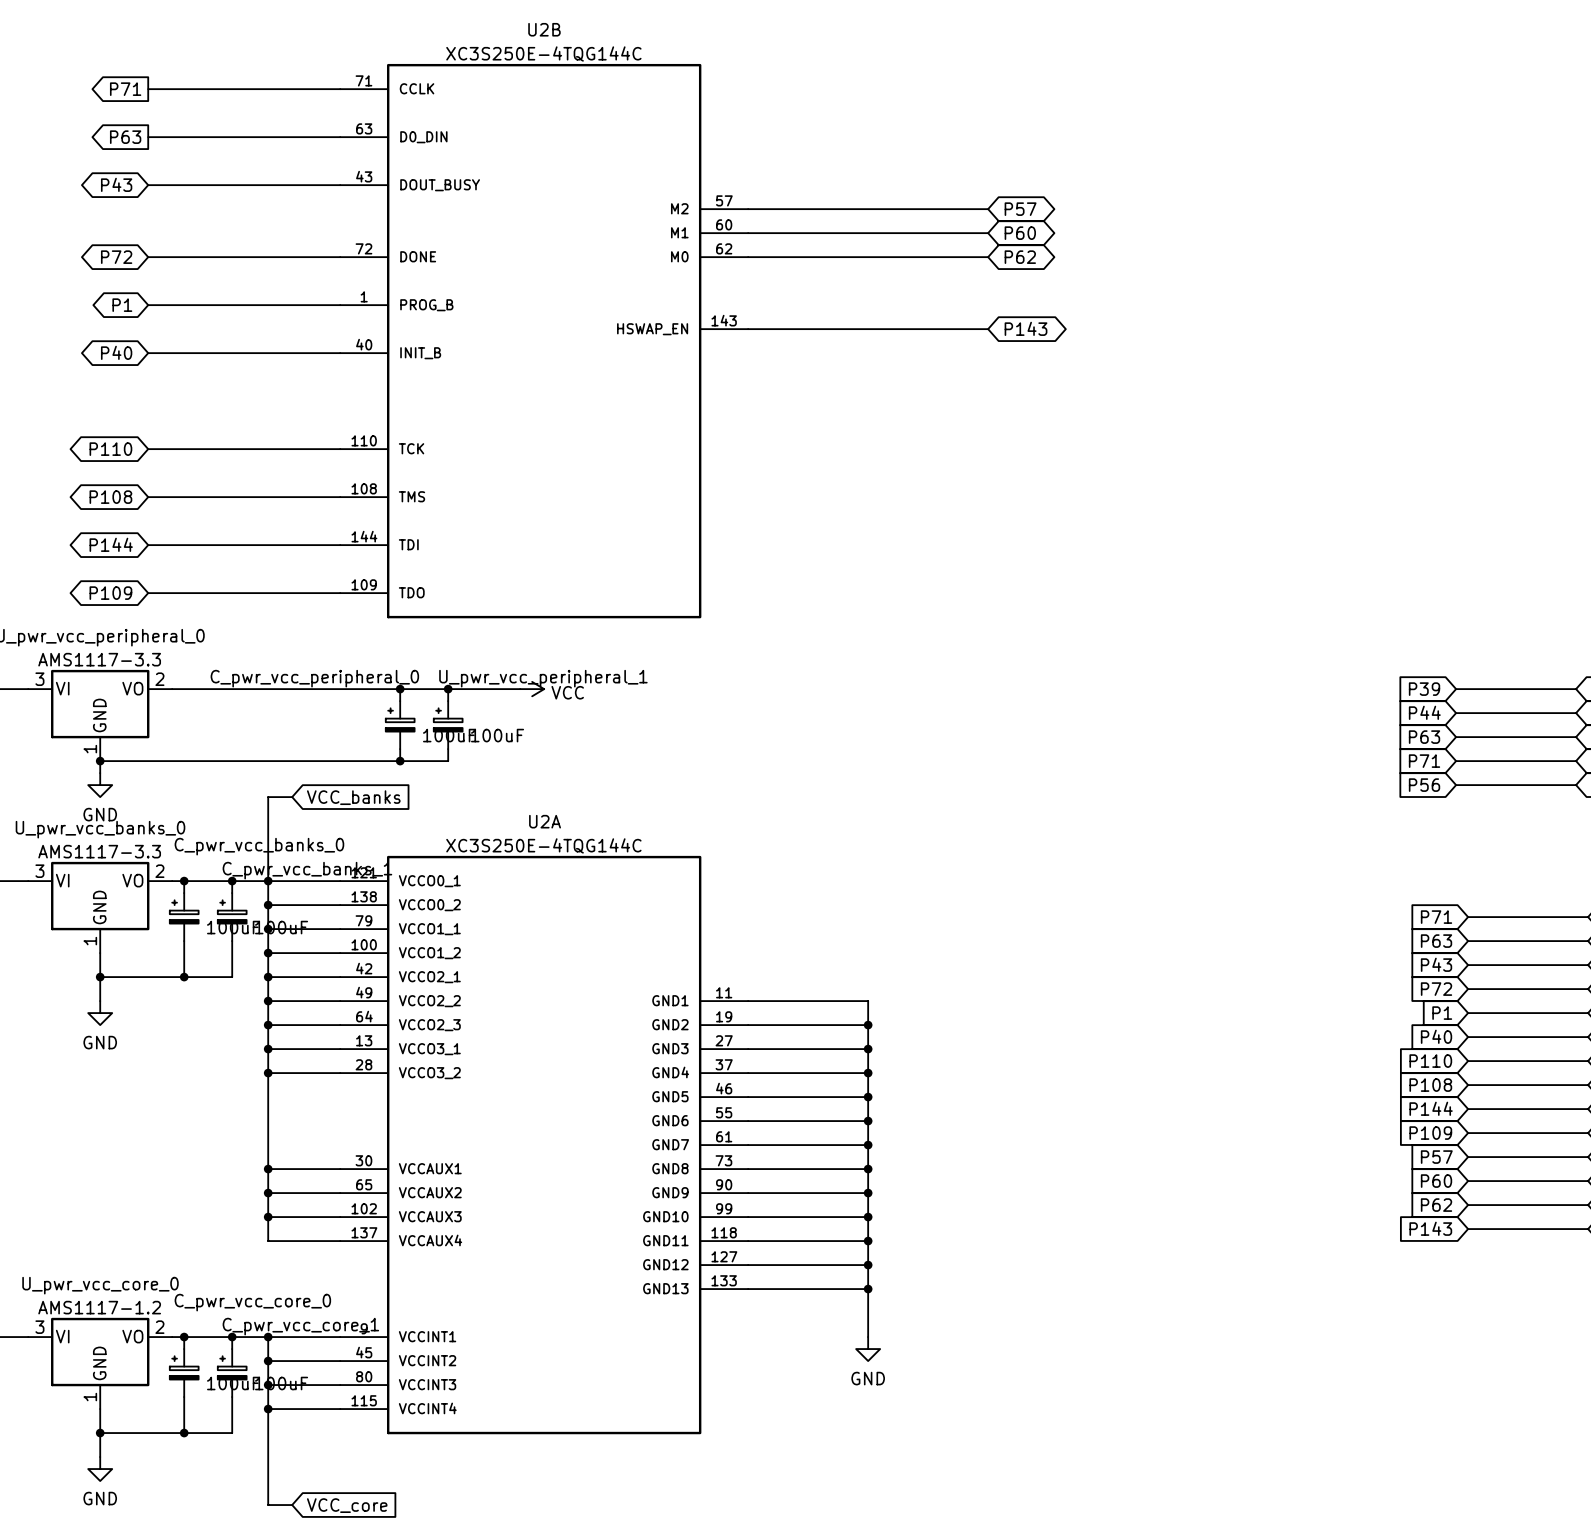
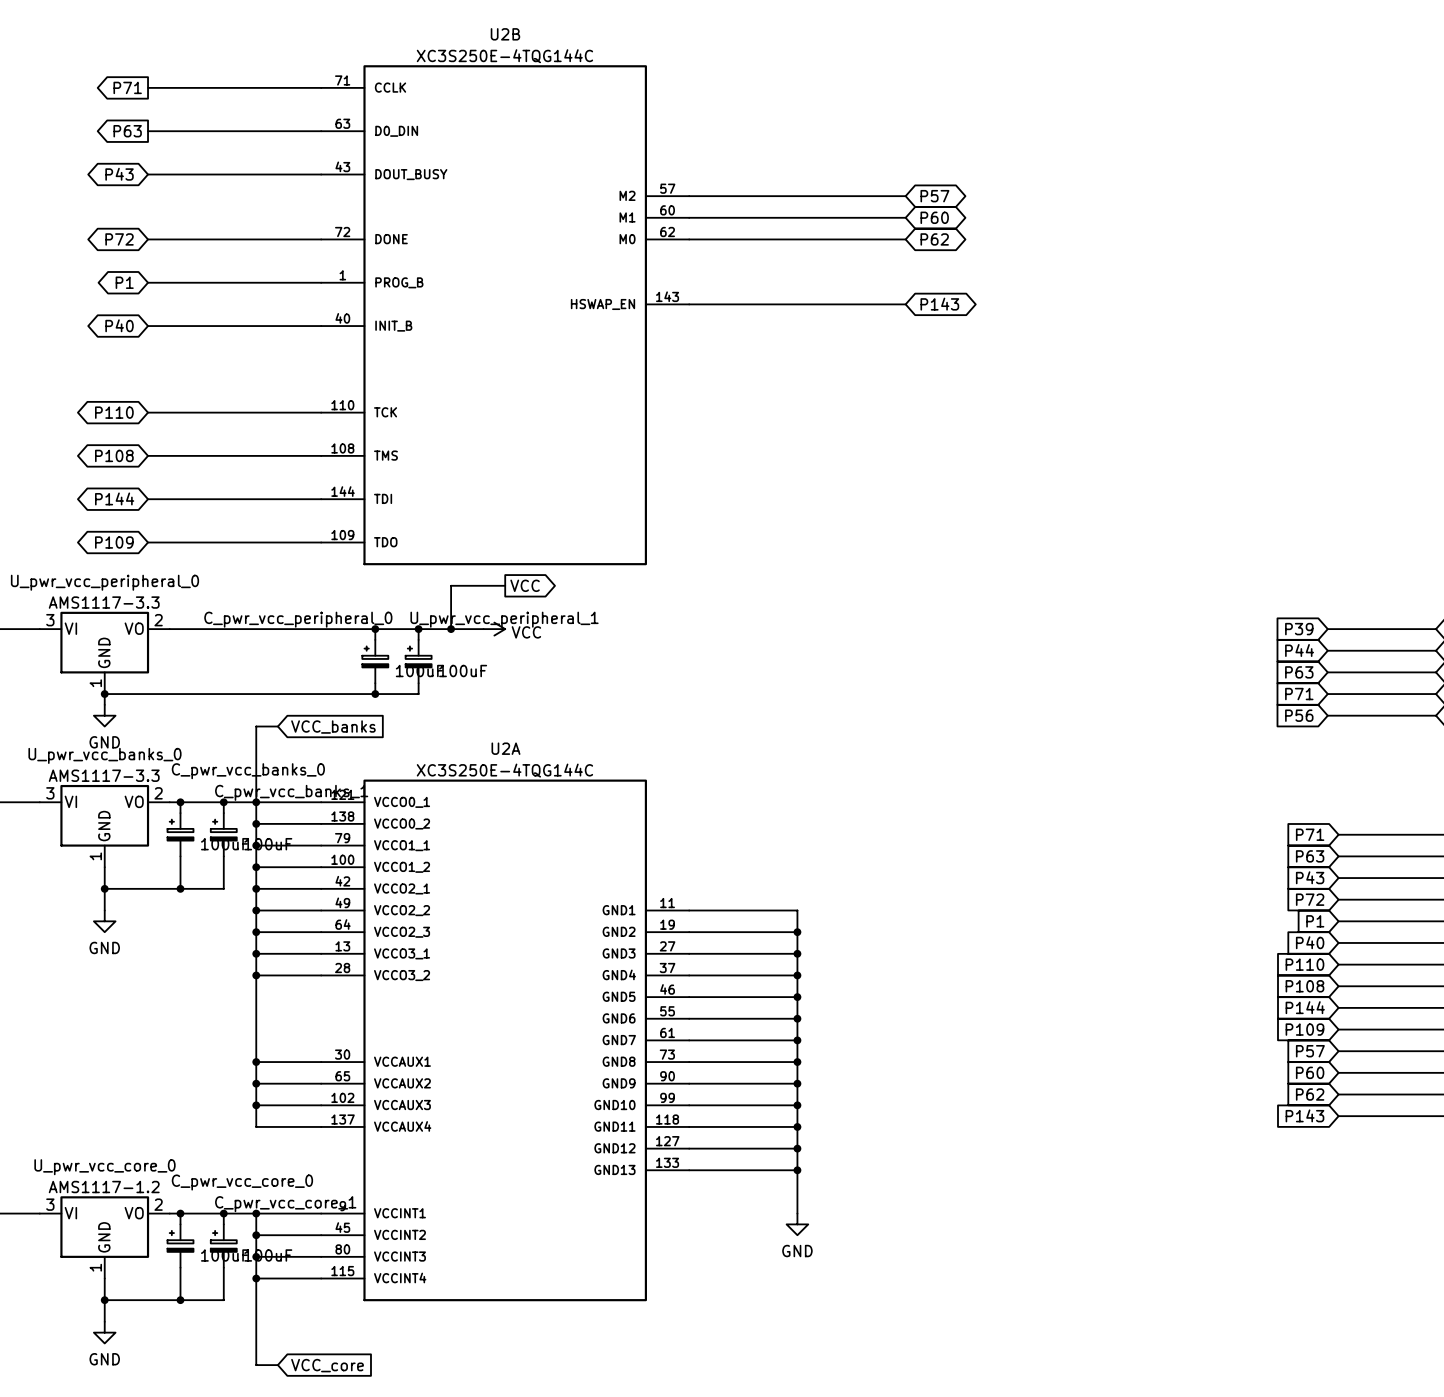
wire: none -> (505, 585) (451, 585) (451, 629)
global label: none -> VCC (525, 585)
junction: none -> (451, 629)

